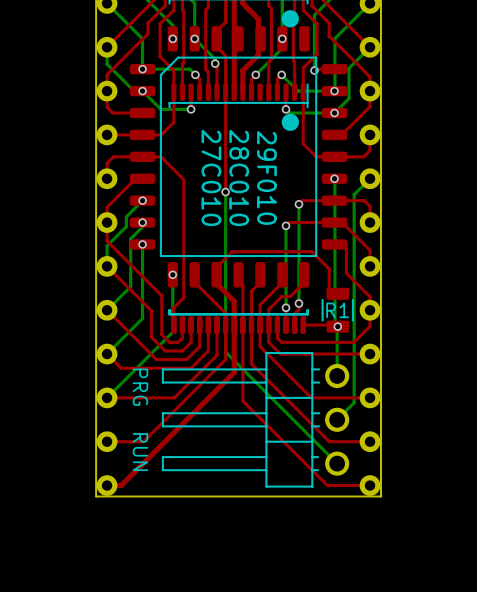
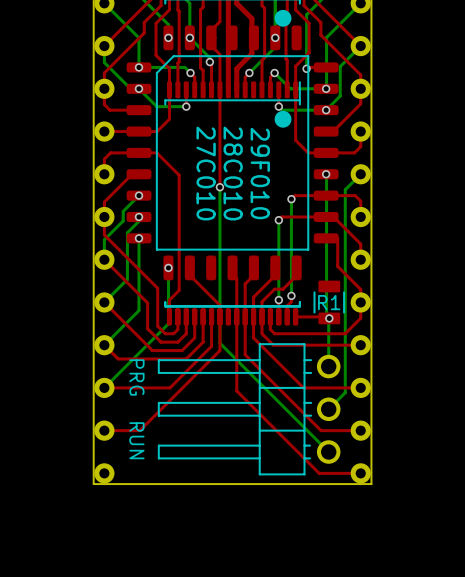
top track: (337, 293) (332, 293) (329, 290) (329, 268) (311, 251) (232, 251) (216, 267) (216, 283) (234, 301) (234, 372) (121, 485) (107, 485) -> none

